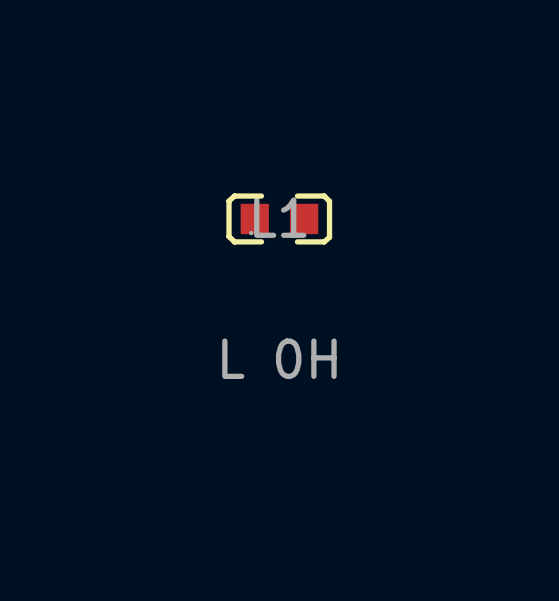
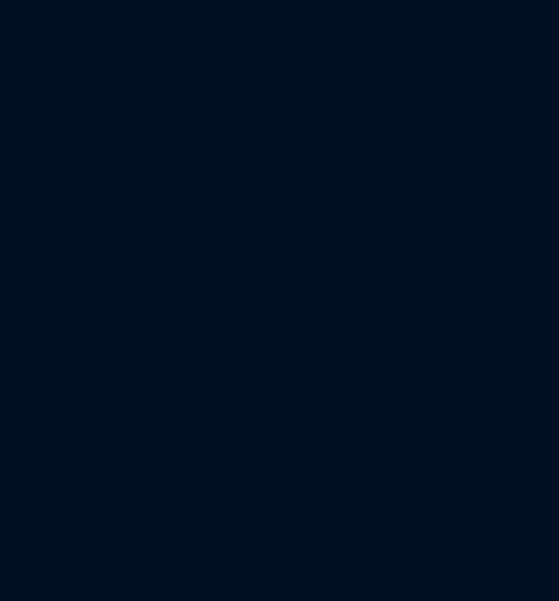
L1: L 0H (279, 218) -> none

